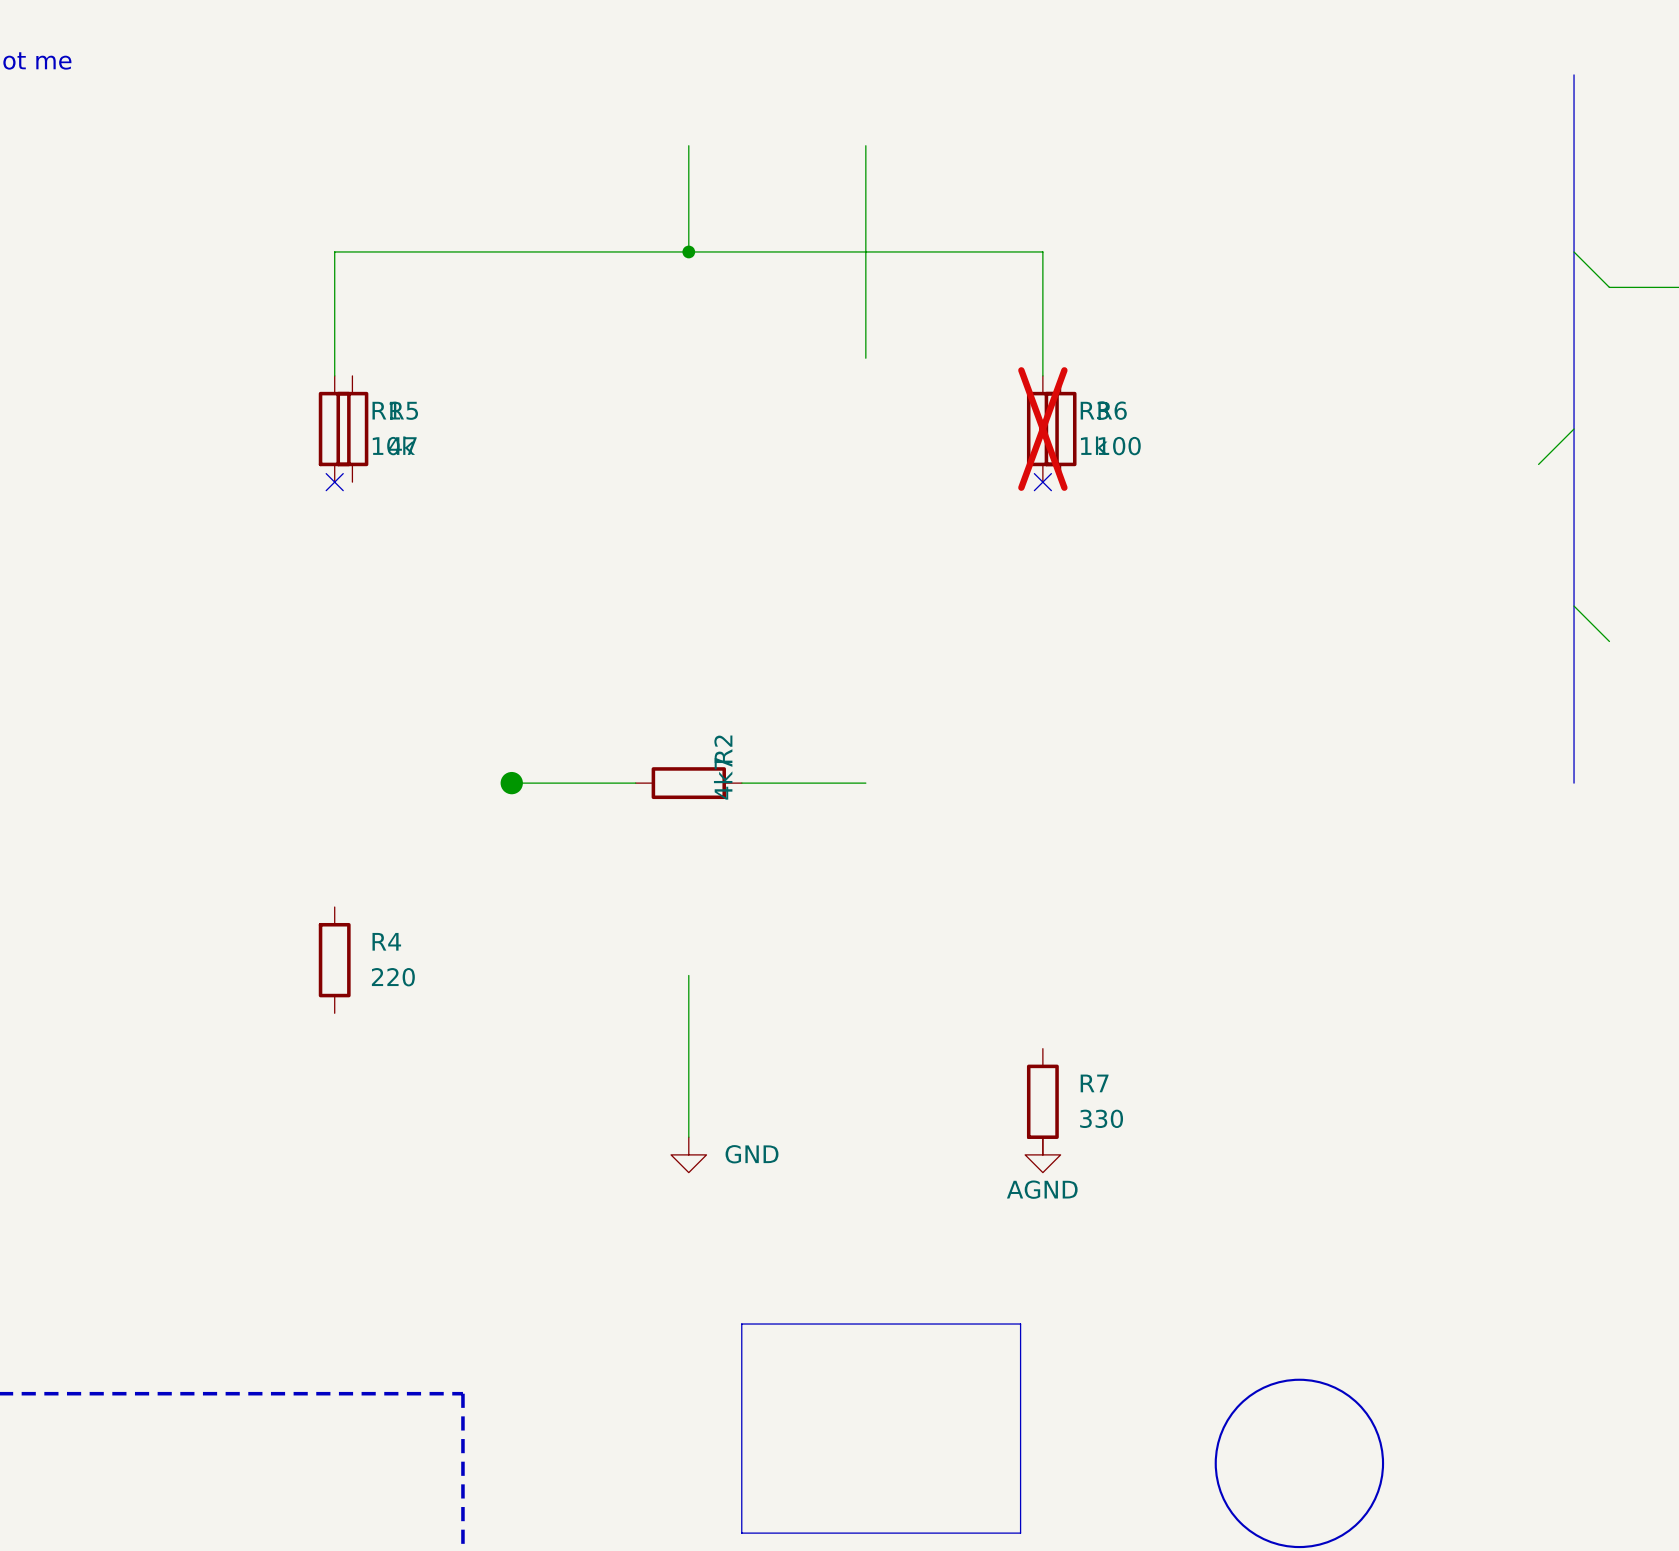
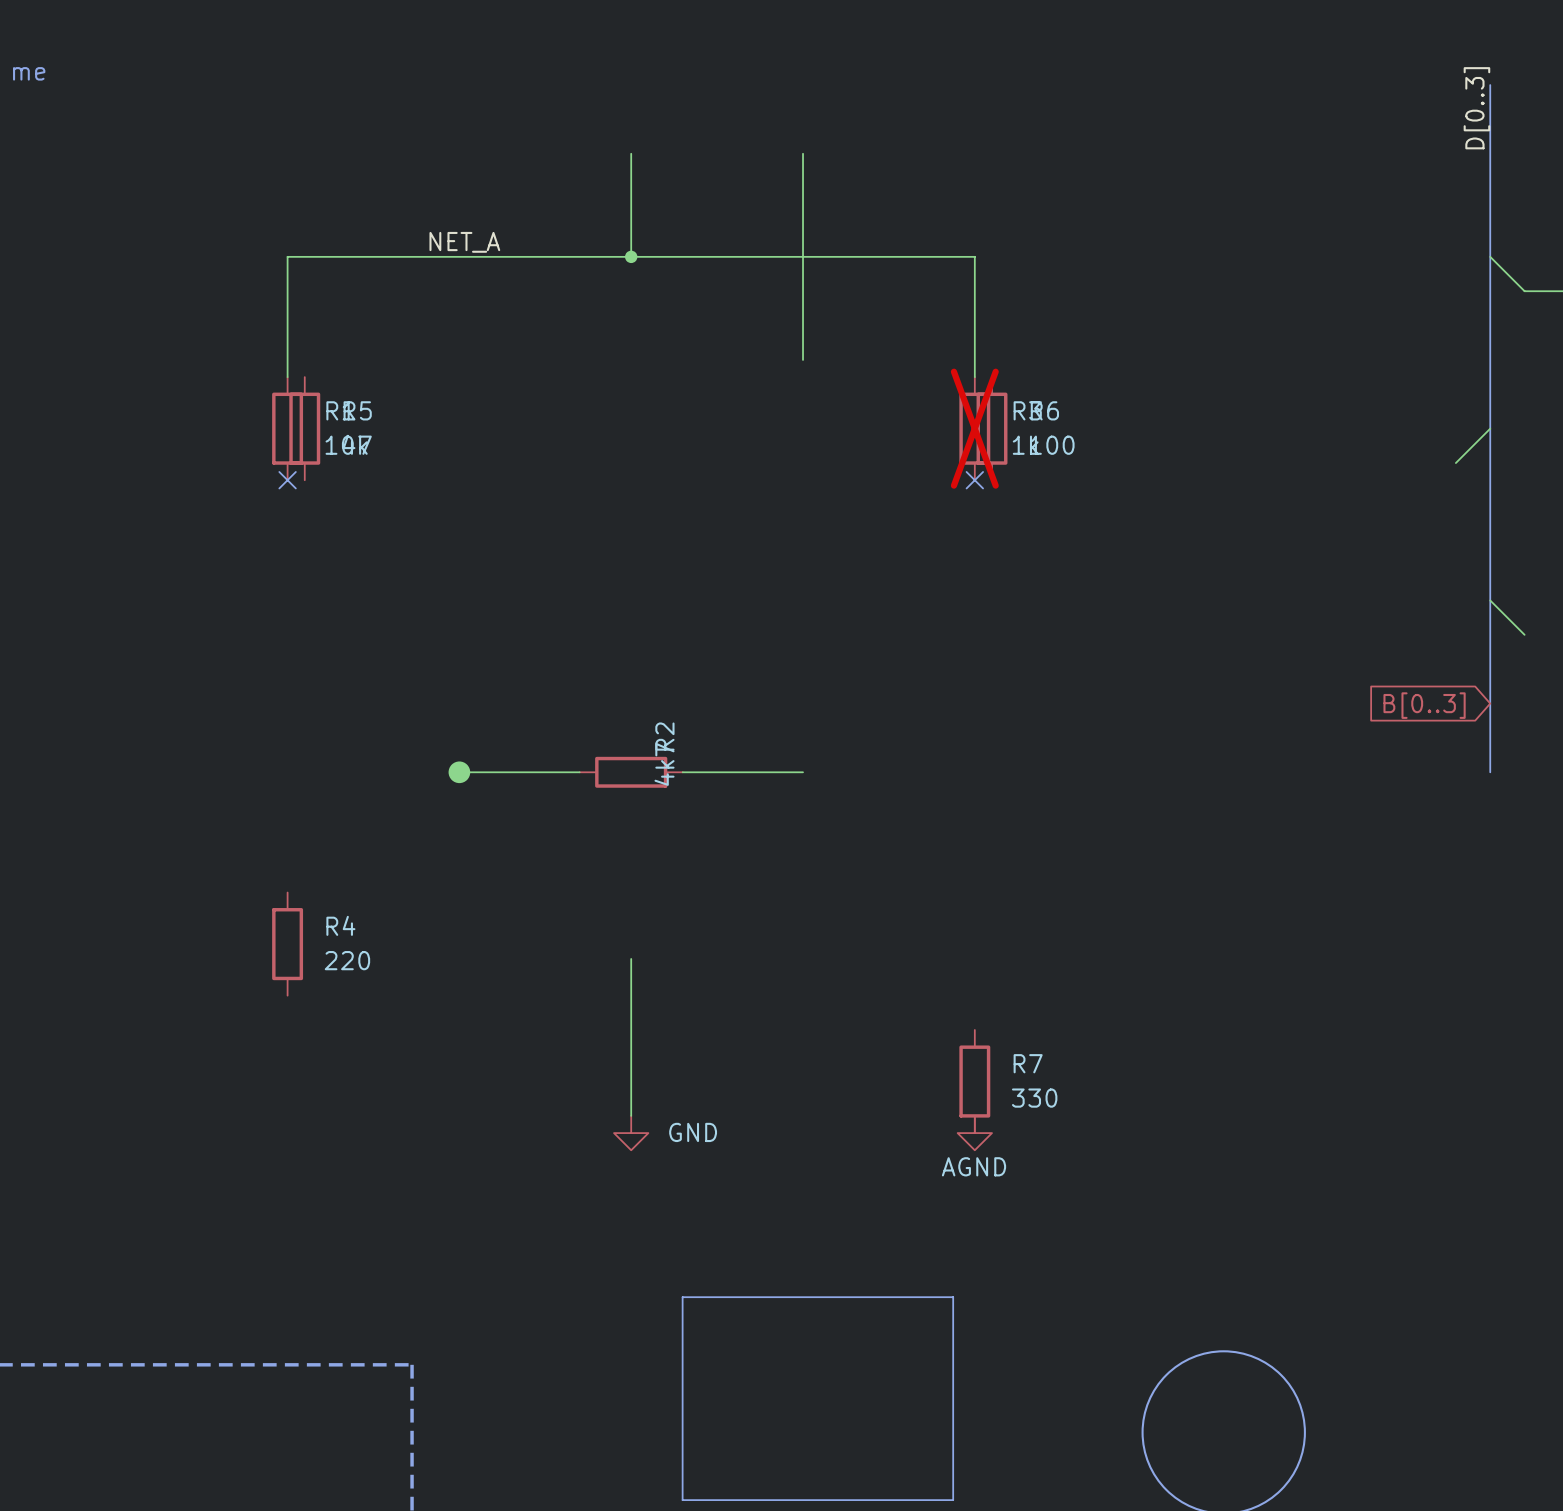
label: none -> D[0..3] (1476, 108)
label: none -> NET_A (464, 242)
global label: none -> B[0..3] (1424, 705)

